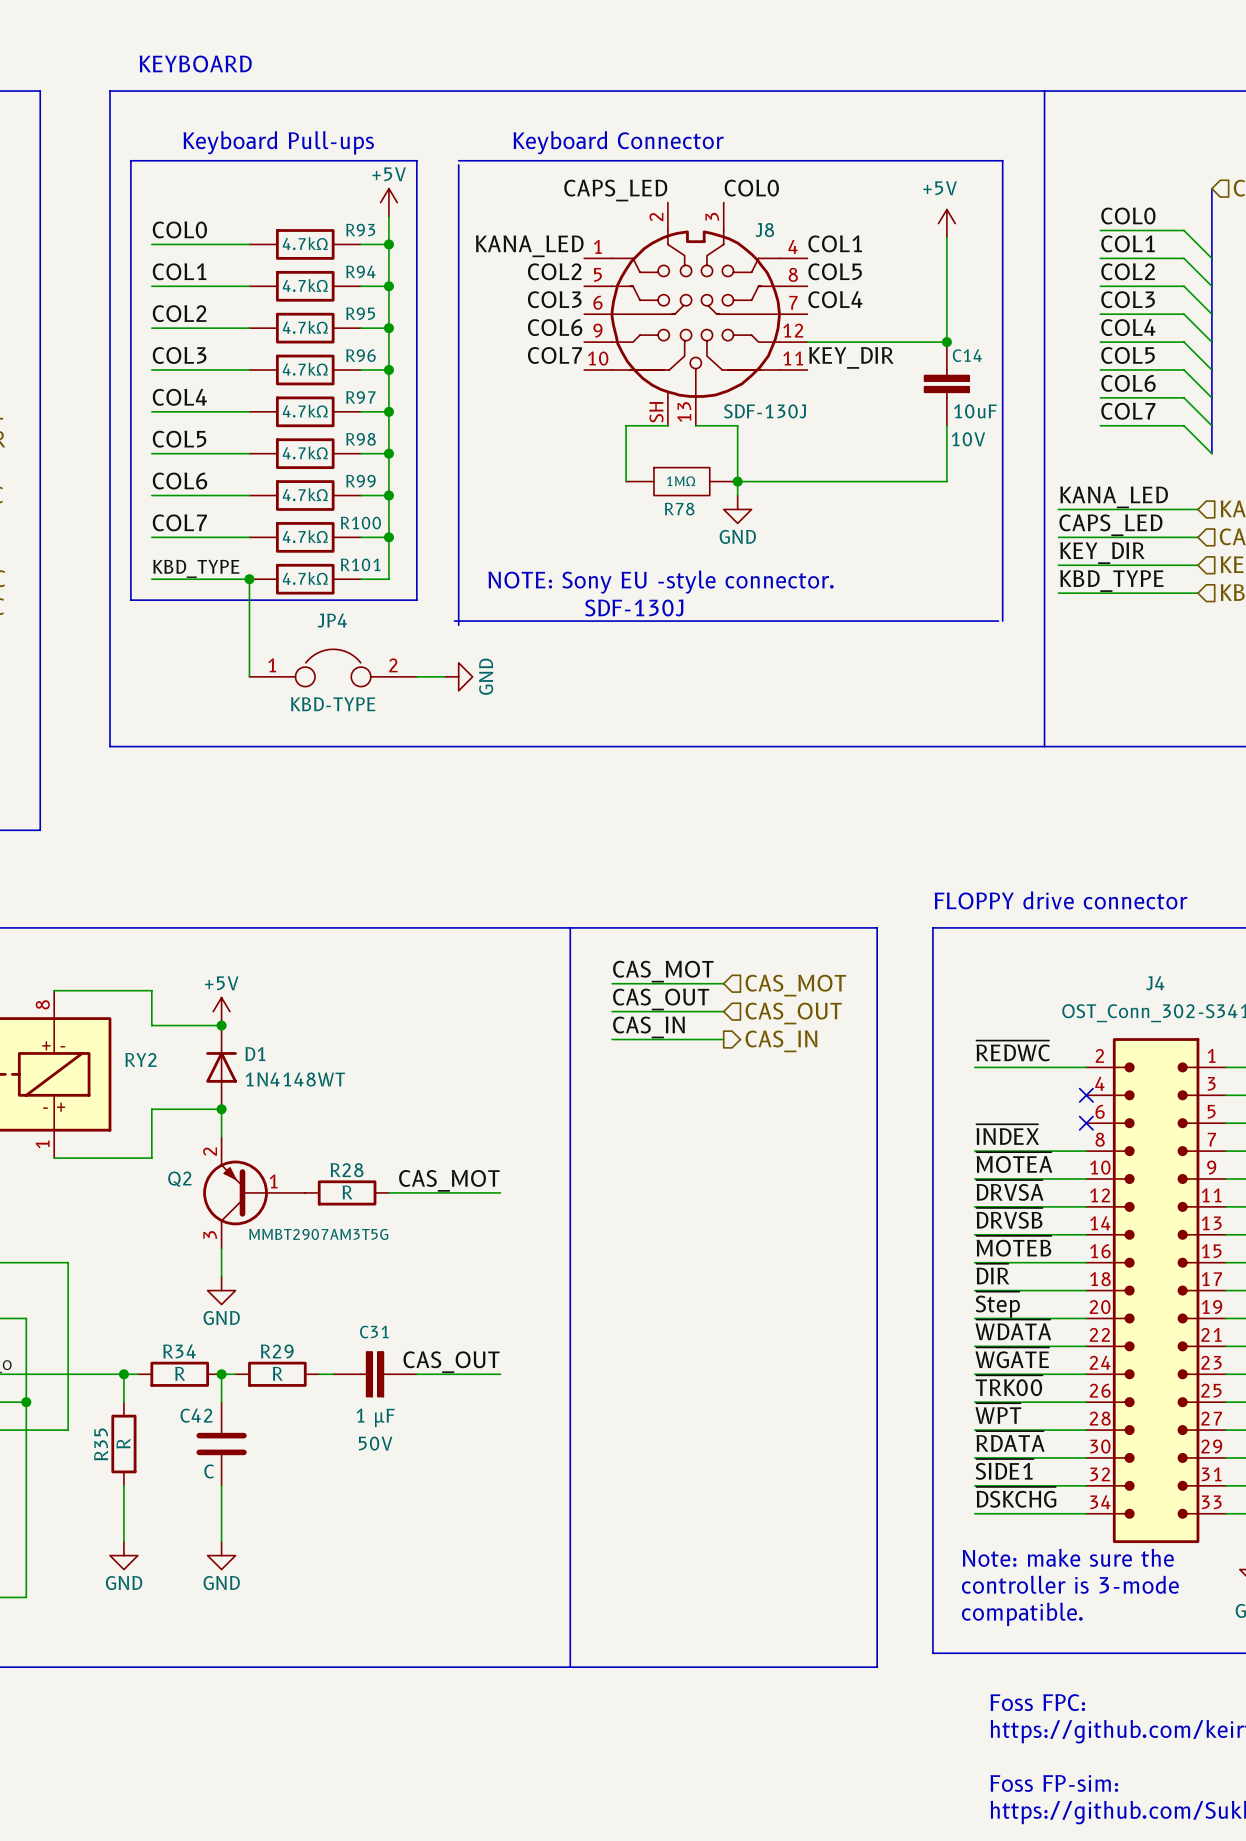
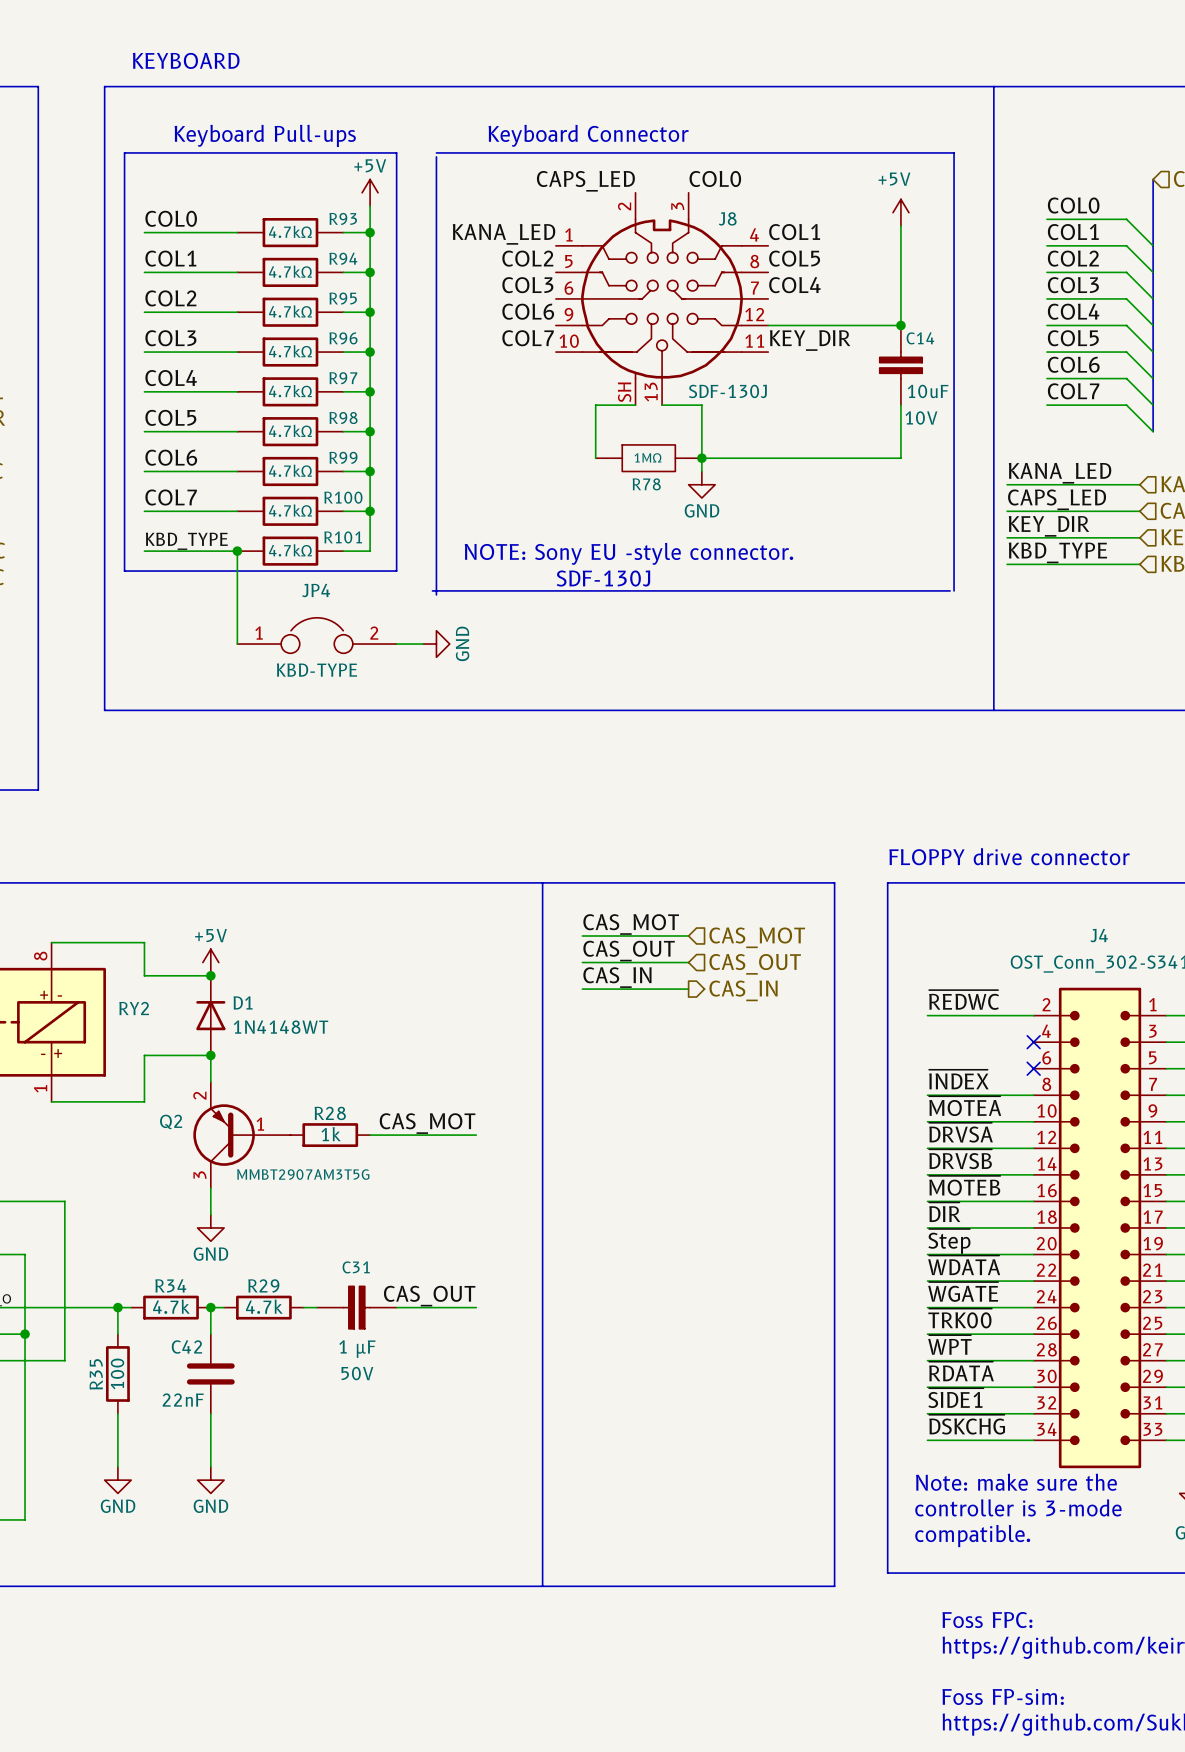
R28 value: R (347, 1192) -> 1k (331, 1134)
R34 value: R (180, 1373) -> 4.7k (171, 1306)
R29 value: R (277, 1373) -> 4.7k (264, 1306)
R35 value: R (123, 1443) -> 100 (117, 1373)
C42 value: C (209, 1471) -> 22nF (183, 1400)

